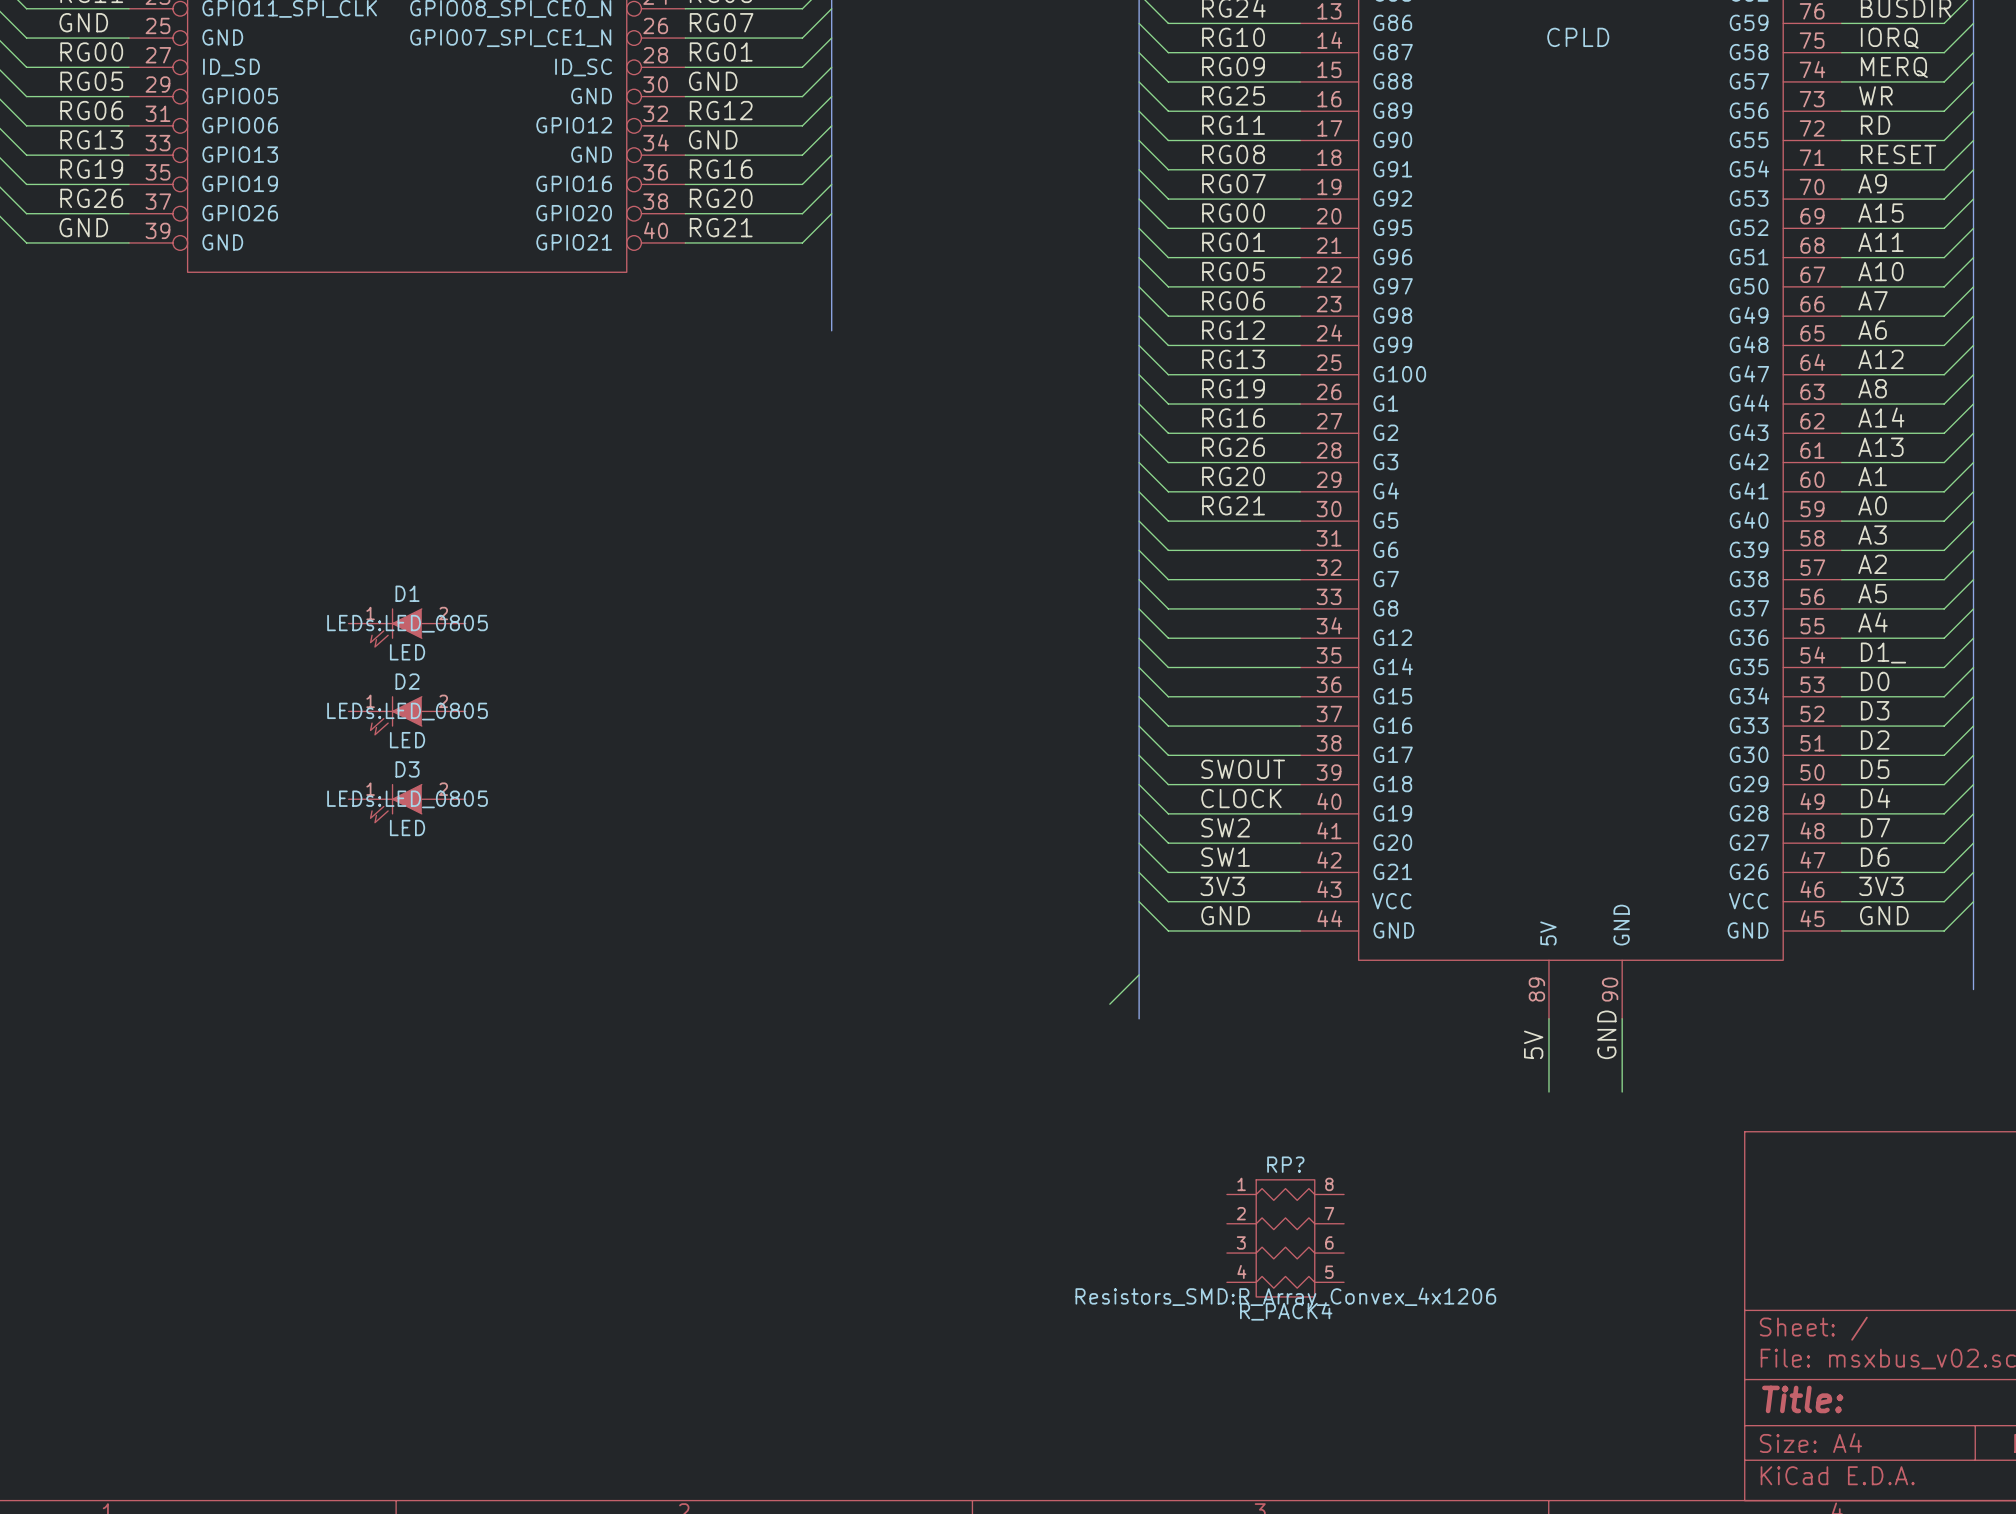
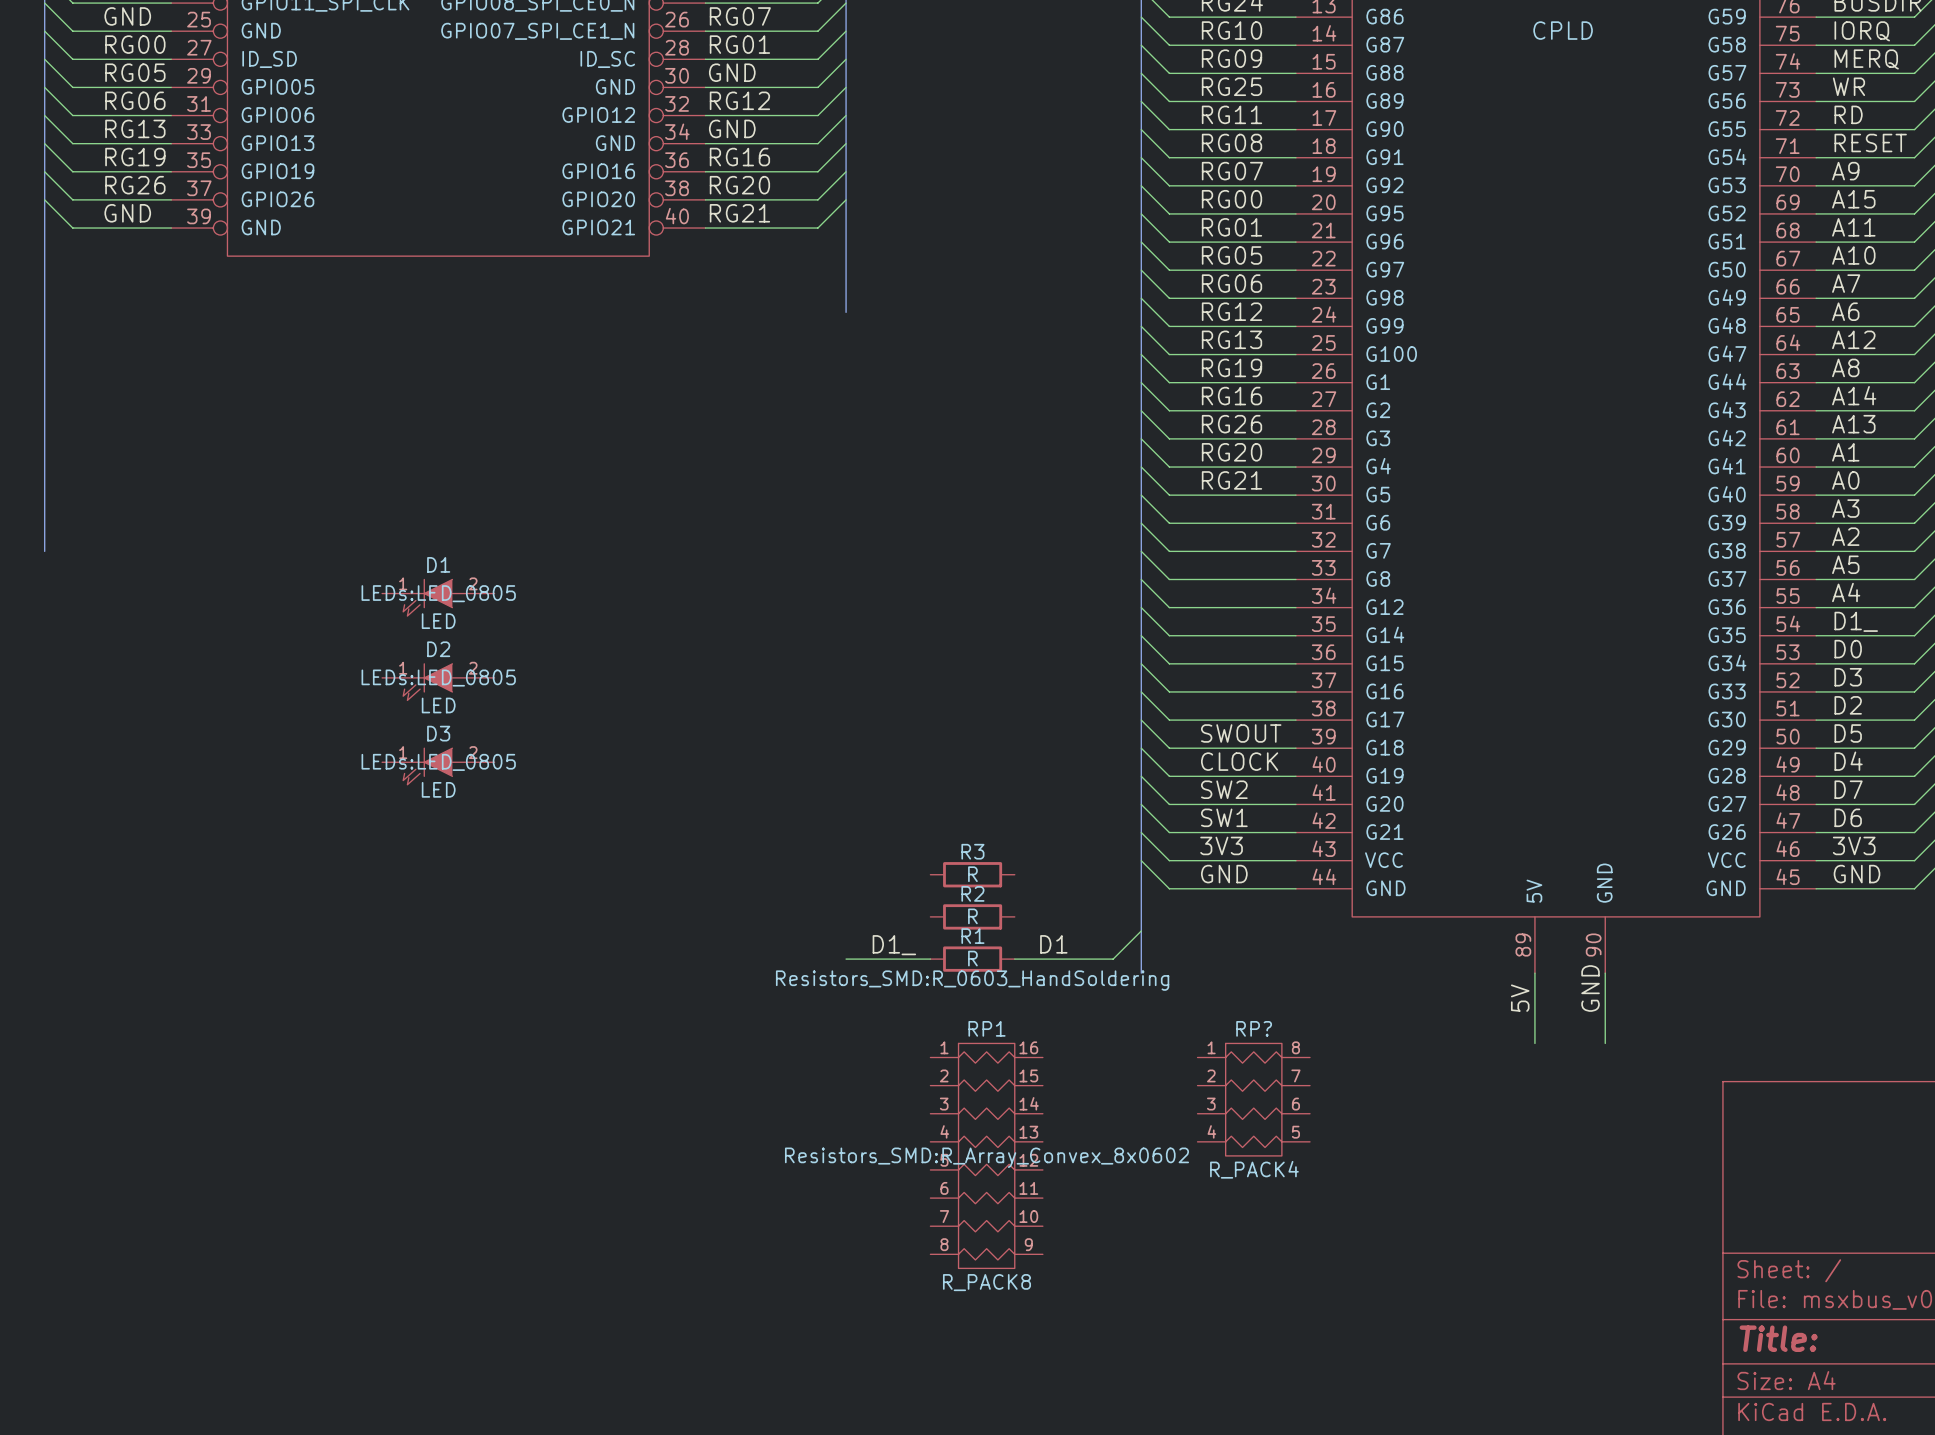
R3: none -> R (972, 874)
R2: none -> R (972, 916)
label: none -> D1 (1053, 944)
label: none -> D1_ (894, 945)
wire: none -> (846, 959) (930, 959)
R1: none -> R (972, 959)
wire: none -> (1014, 959) (1113, 959)
RP?: none -> R_PACK4 (1253, 1099)
RP1: none -> R_PACK8 (986, 1155)
RP?: R_PACK4 (1285, 1238) -> none

